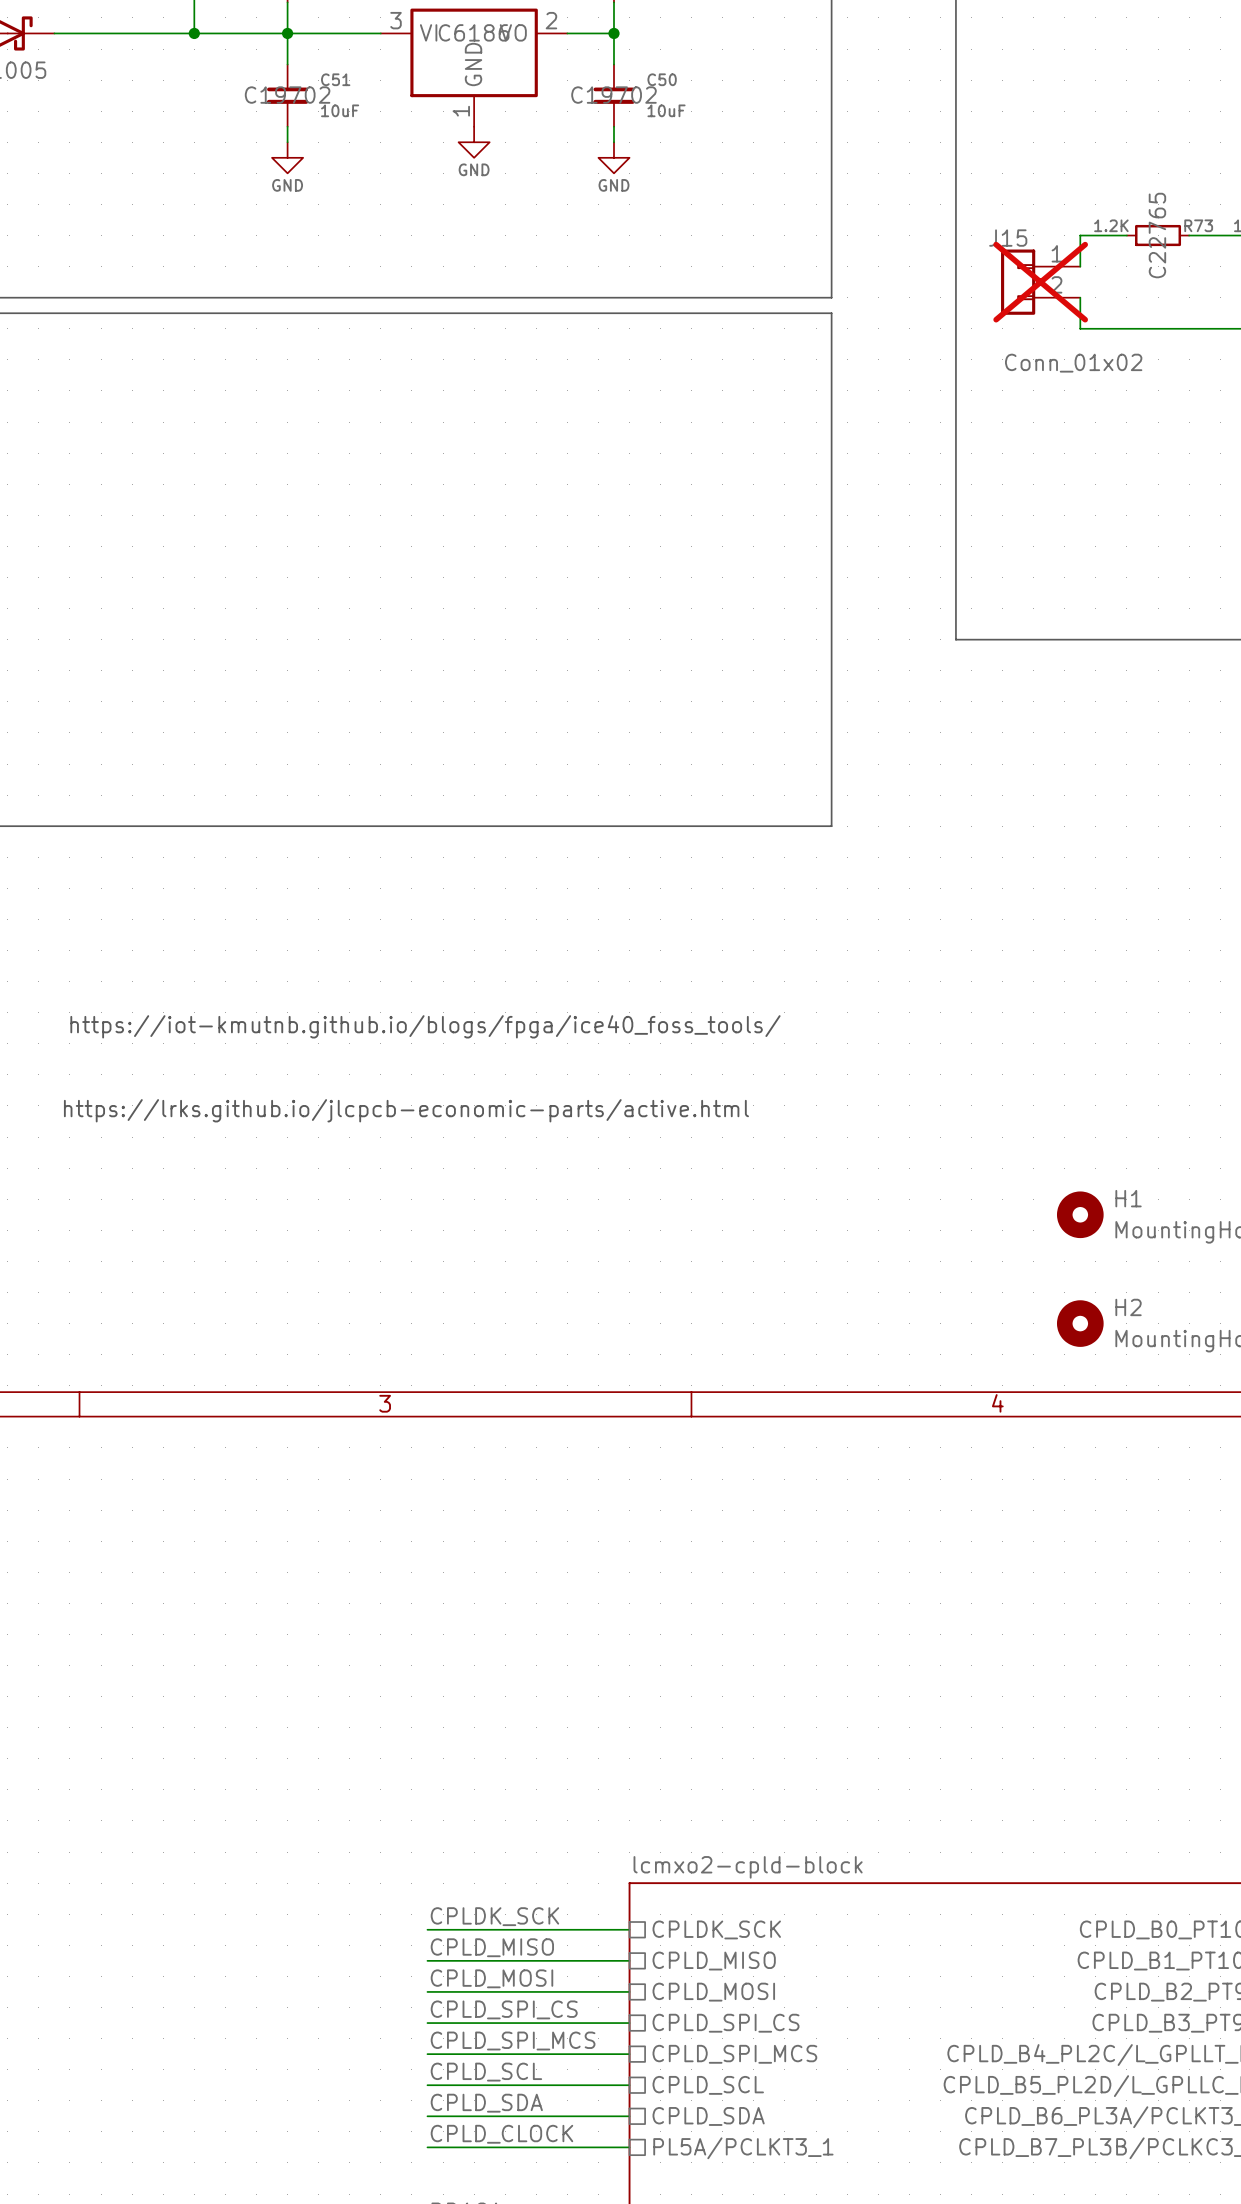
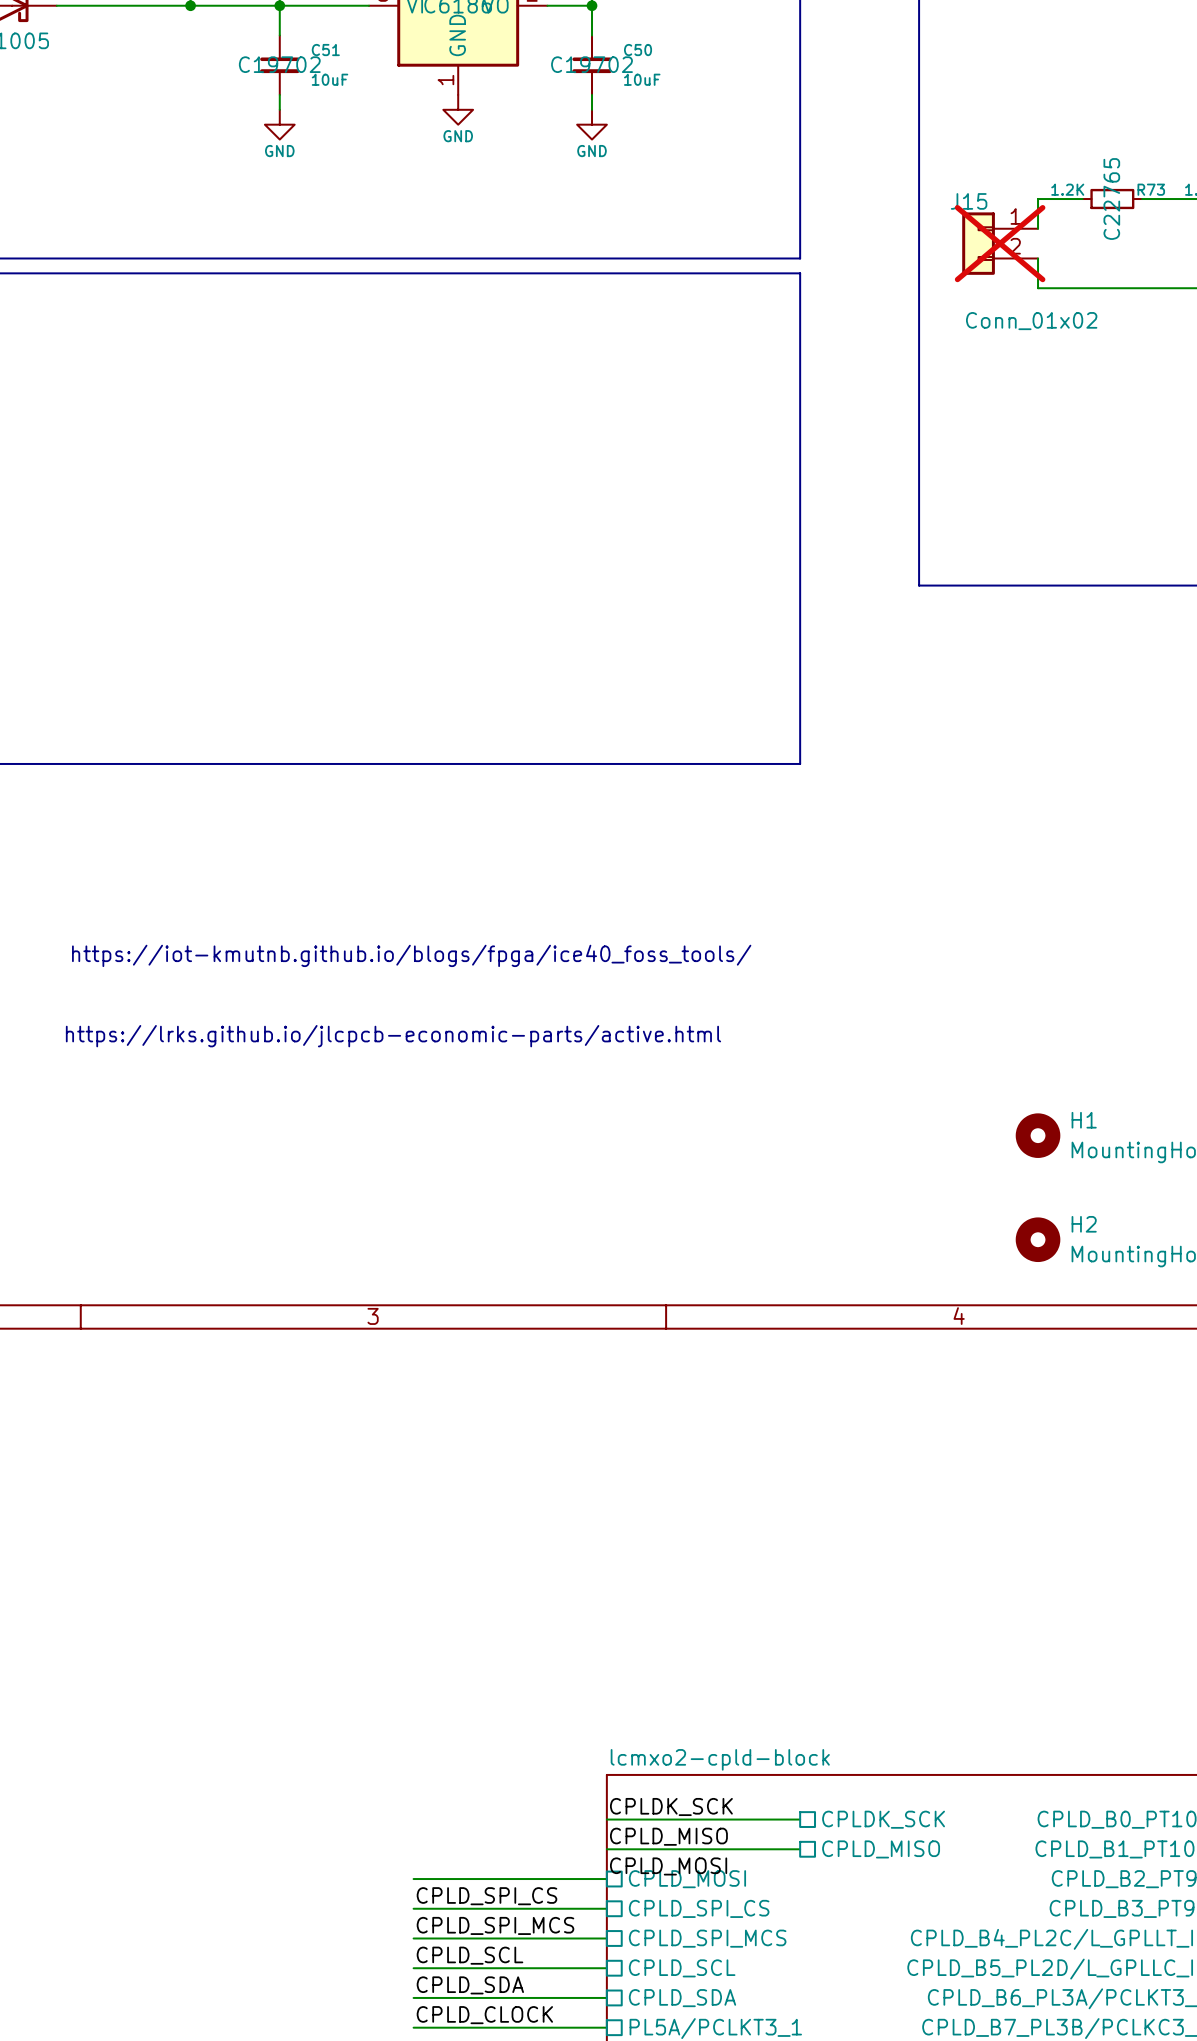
label position: CPLDK_SCK (494, 1916) -> CPLDK_SCK (671, 1806)
wire: (427, 1929) (629, 1929) -> (800, 1819) (606, 1819)
sheet pin position: CPLDK_SCK (716, 1929) -> CPLDK_SCK (883, 1819)
label position: CPLD_MISO (492, 1947) -> CPLD_MISO (668, 1836)
wire: (427, 1960) (629, 1960) -> (800, 1849) (606, 1849)
sheet pin position: CPLD_MISO (714, 1961) -> CPLD_MISO (881, 1849)
label position: CPLD_MOSI (491, 1978) -> CPLD_MOSI (668, 1866)

